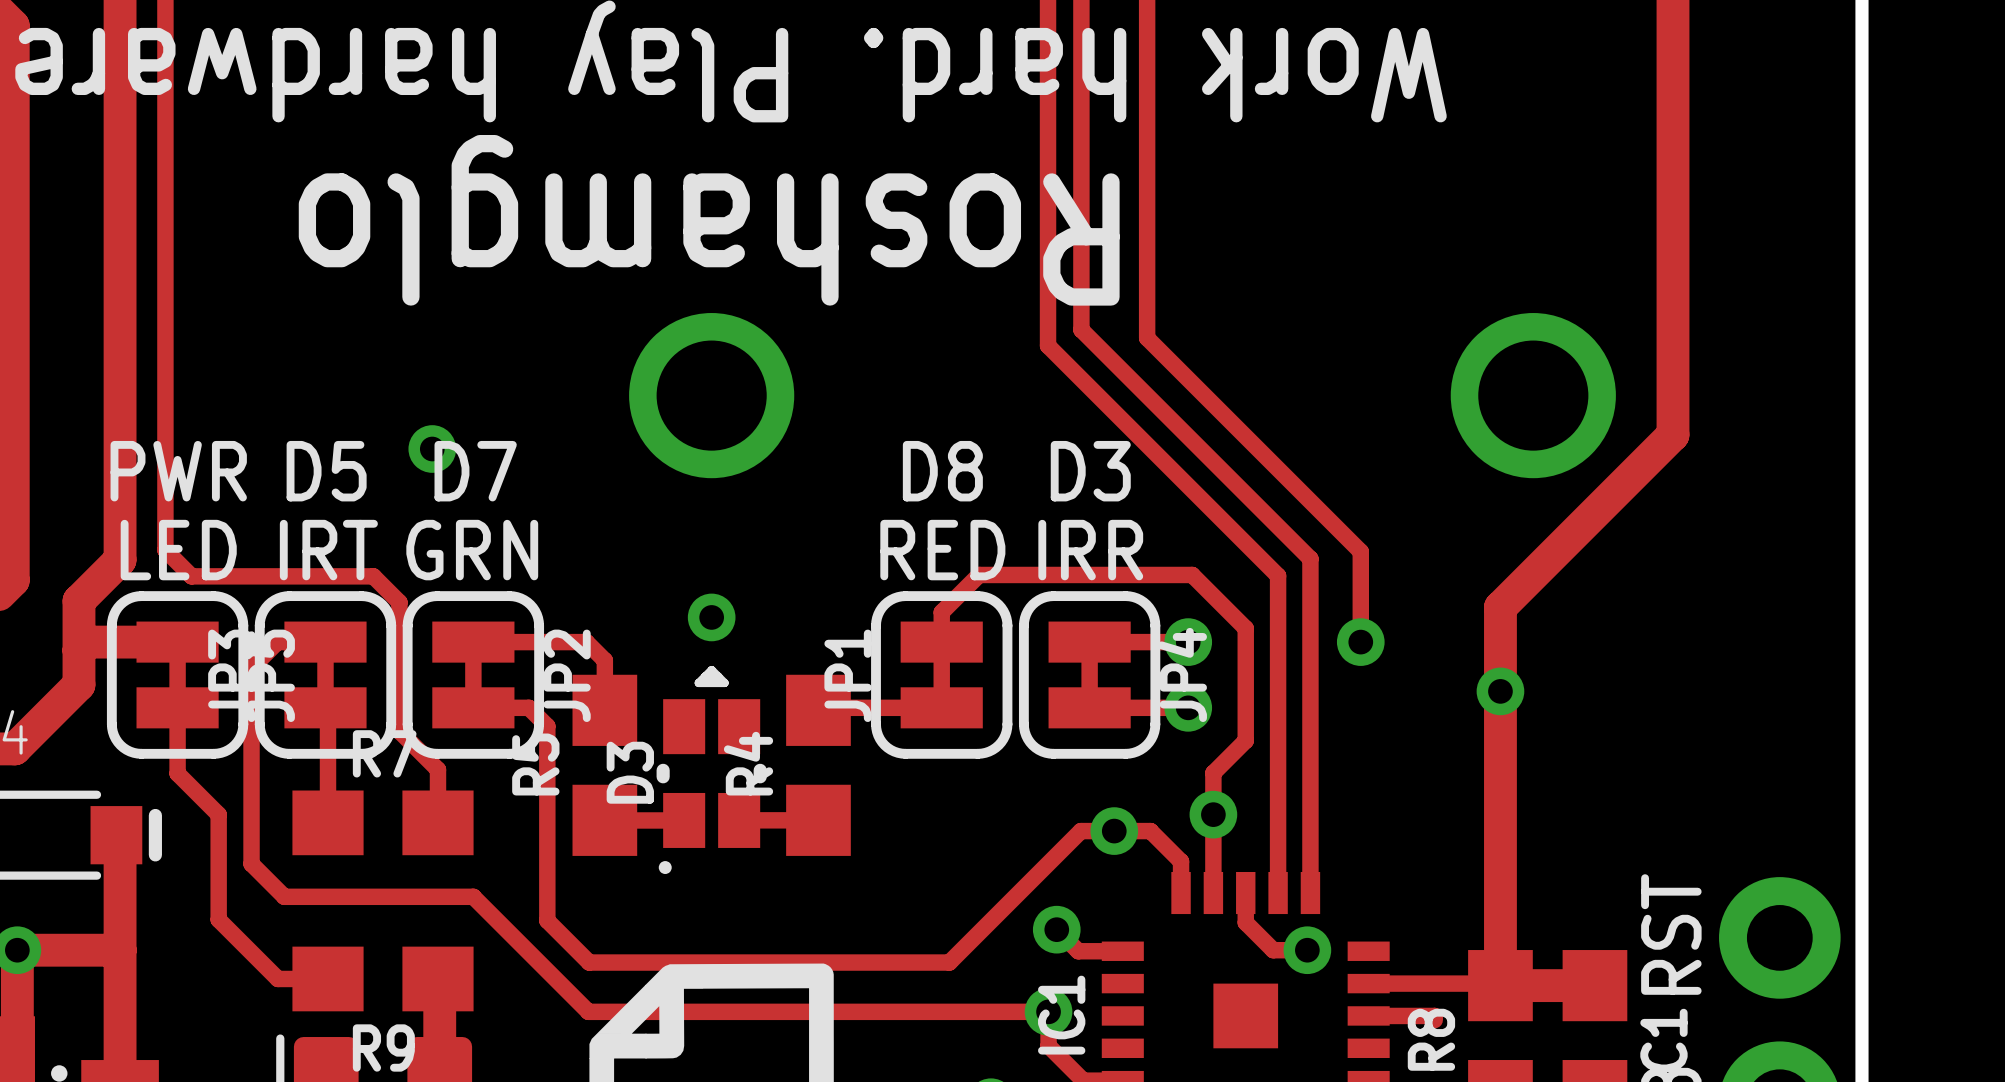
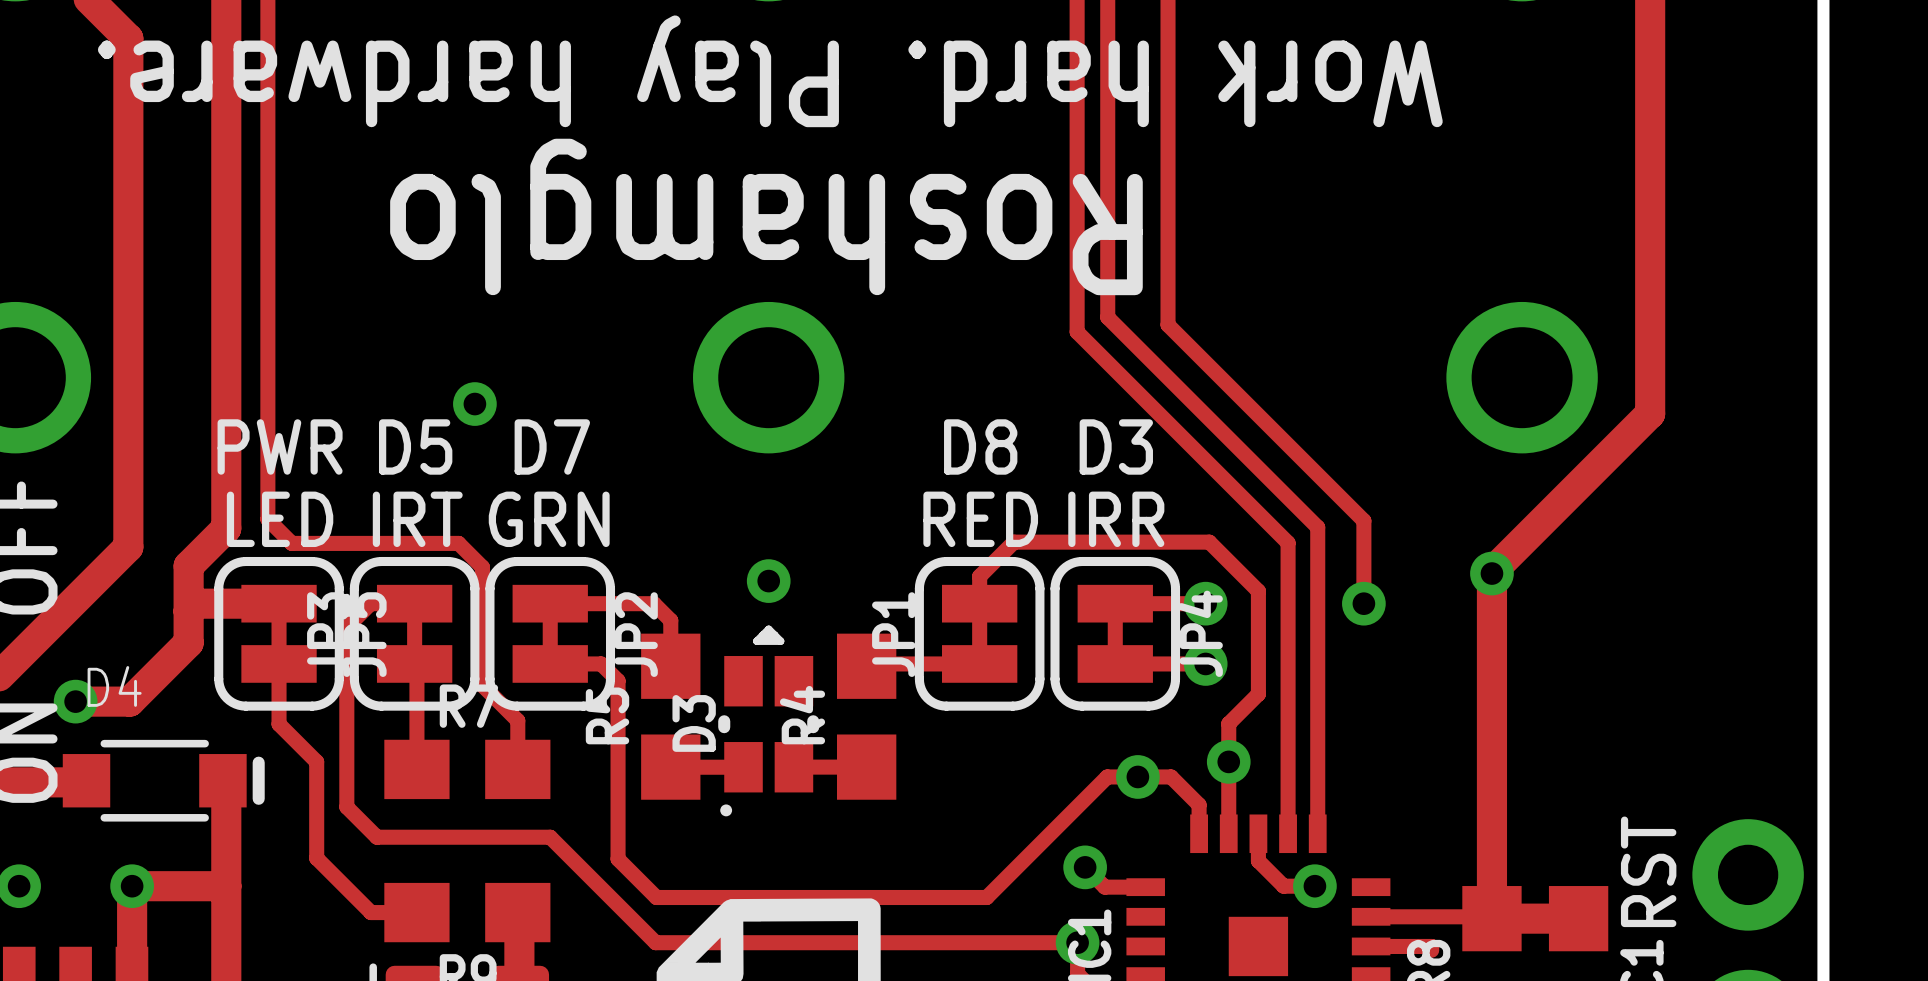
via position: (432, 449) -> (474, 404)
via position: (1500, 691) -> (1491, 573)

